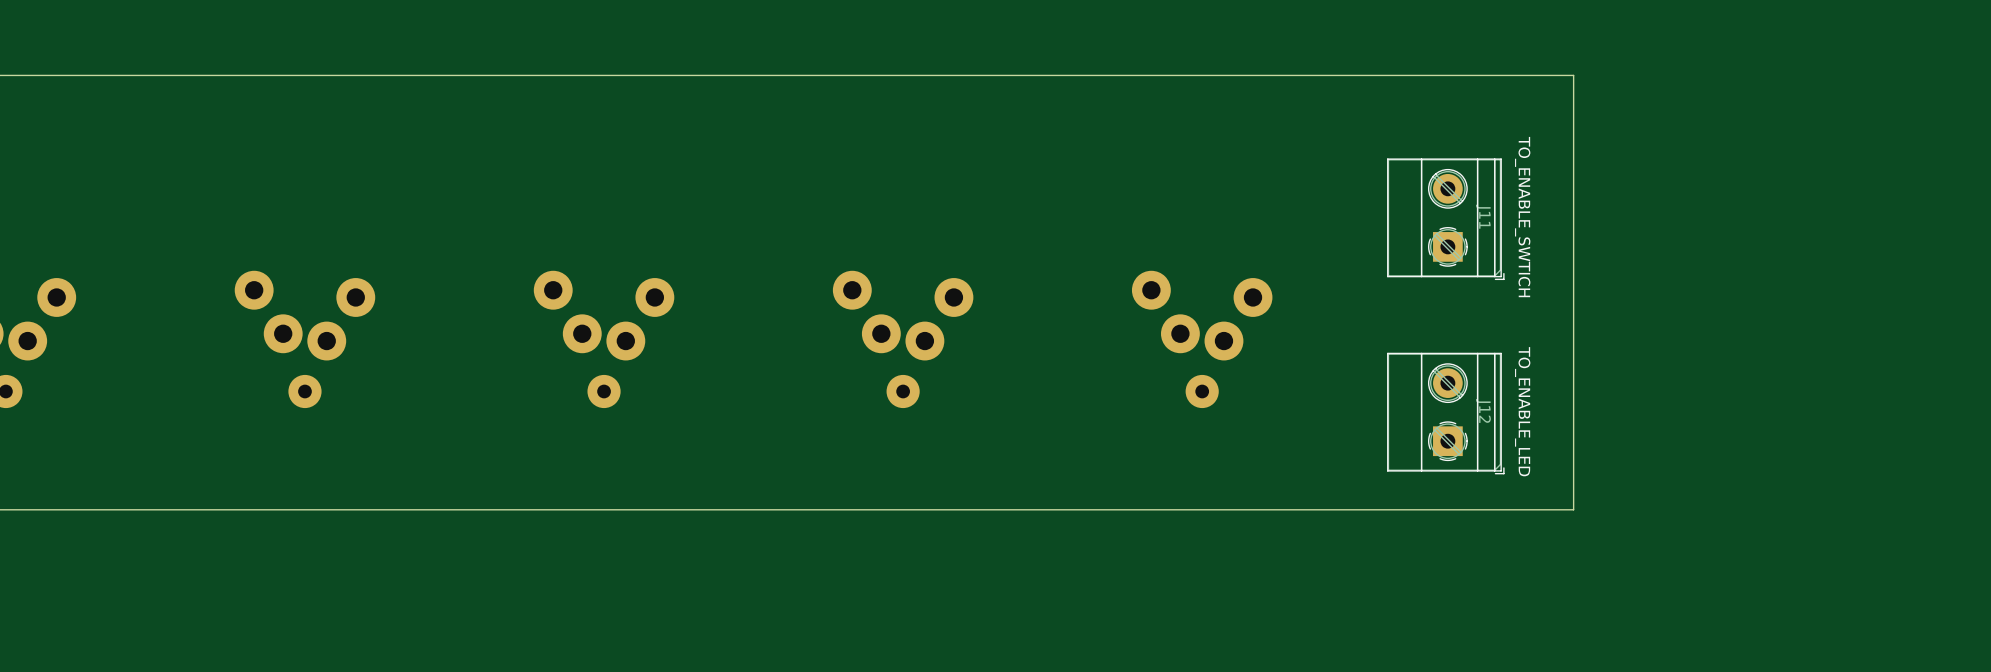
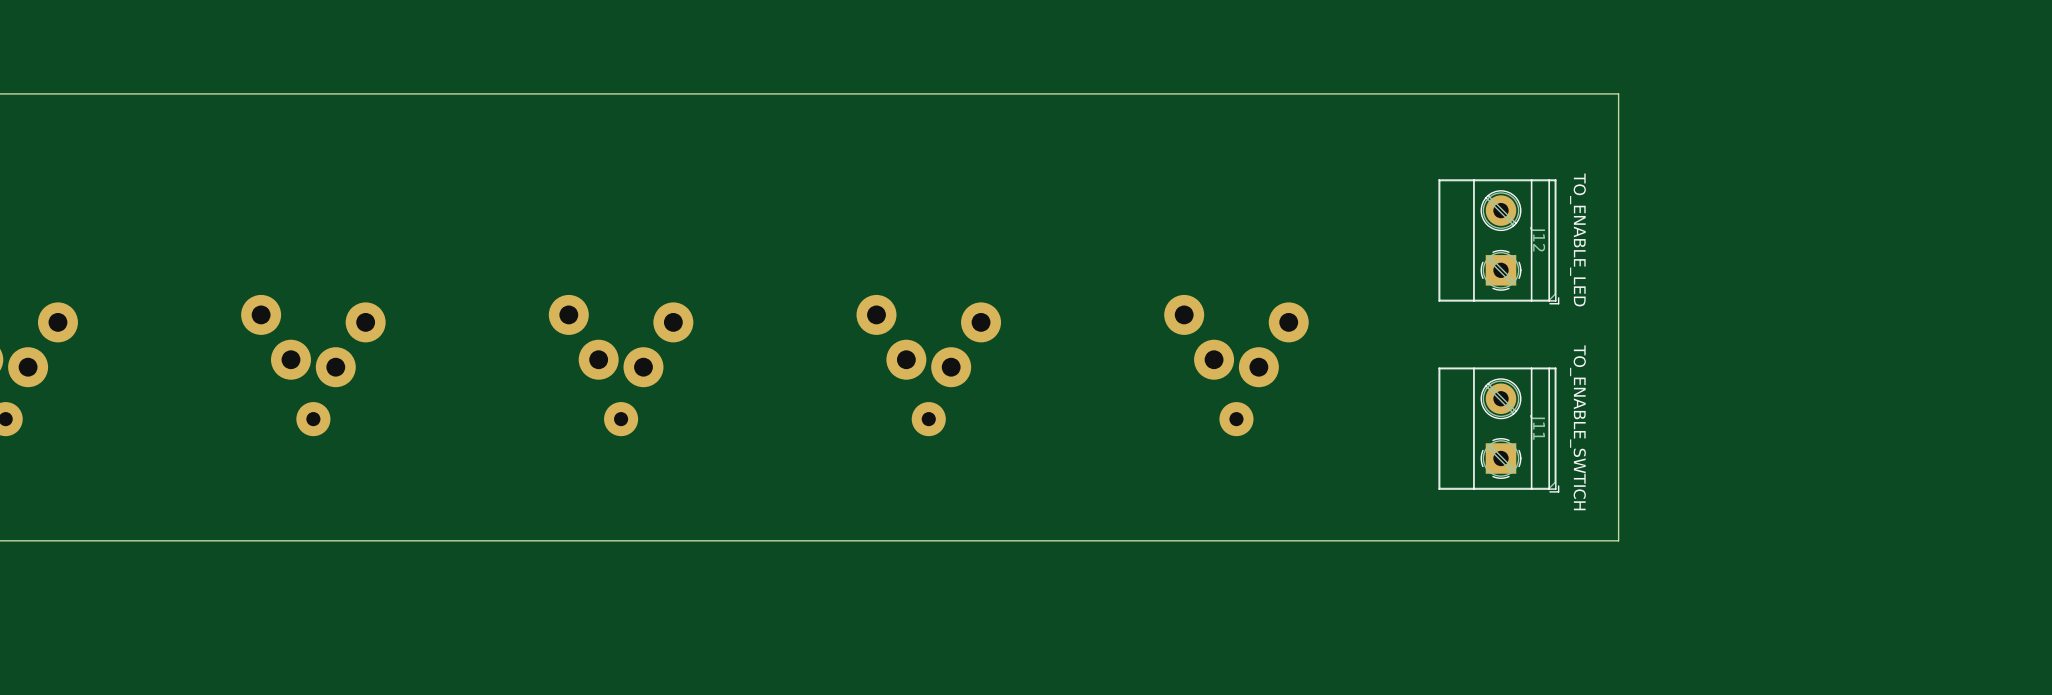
J11 position: (1445, 219) -> (1498, 430)
J12 position: (1445, 413) -> (1498, 241)

